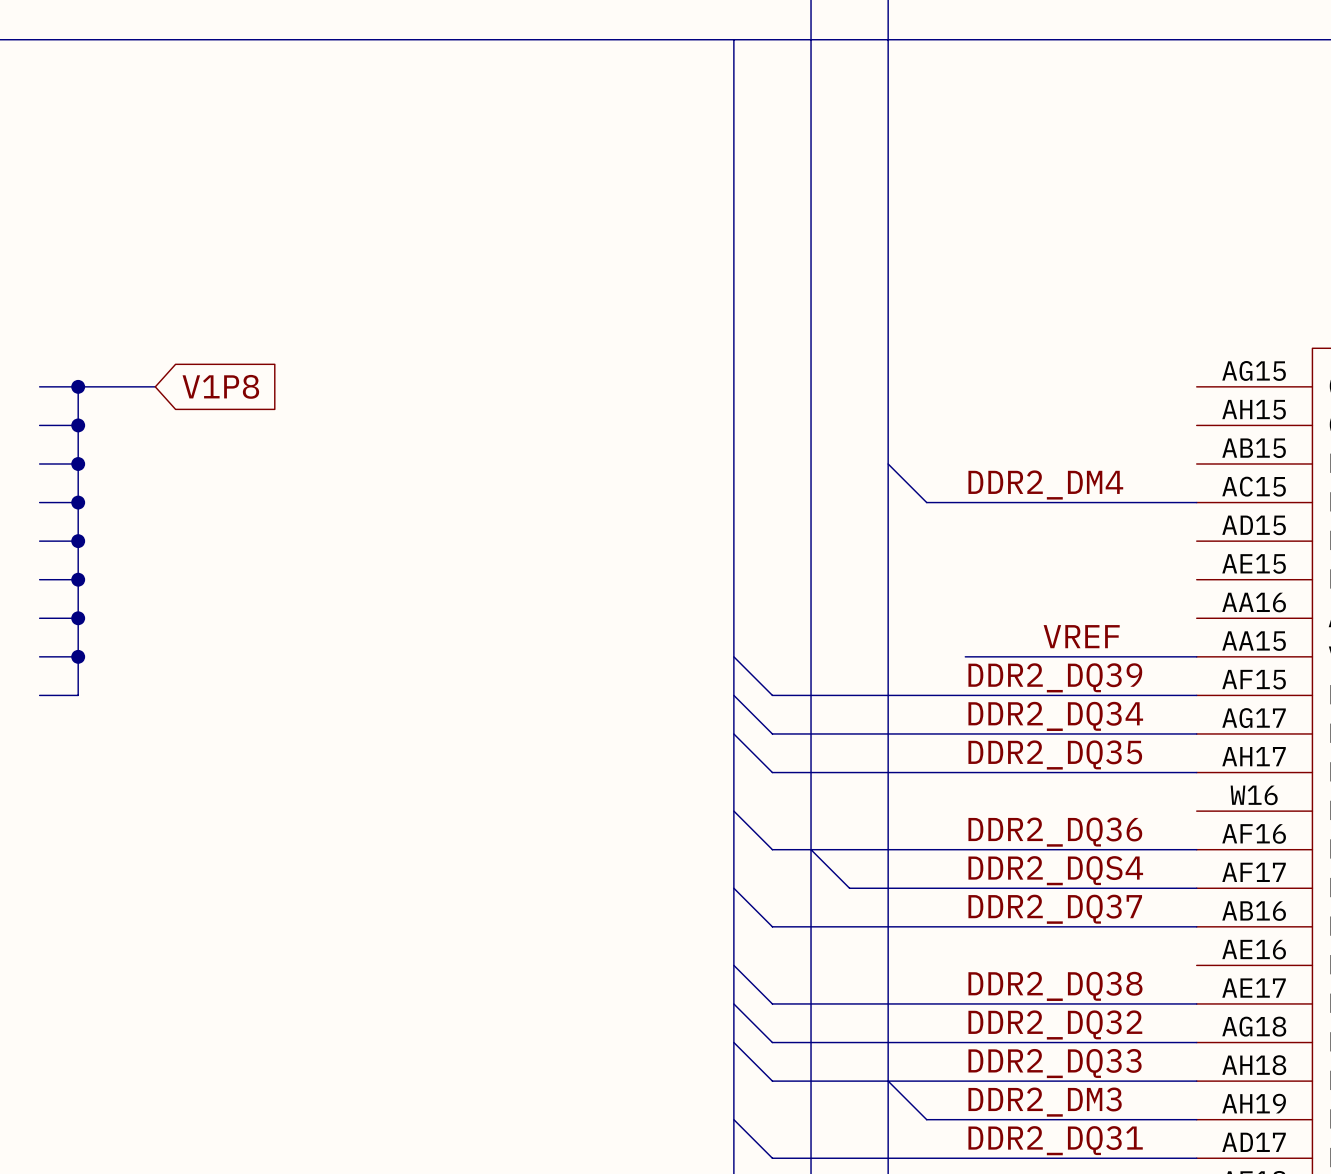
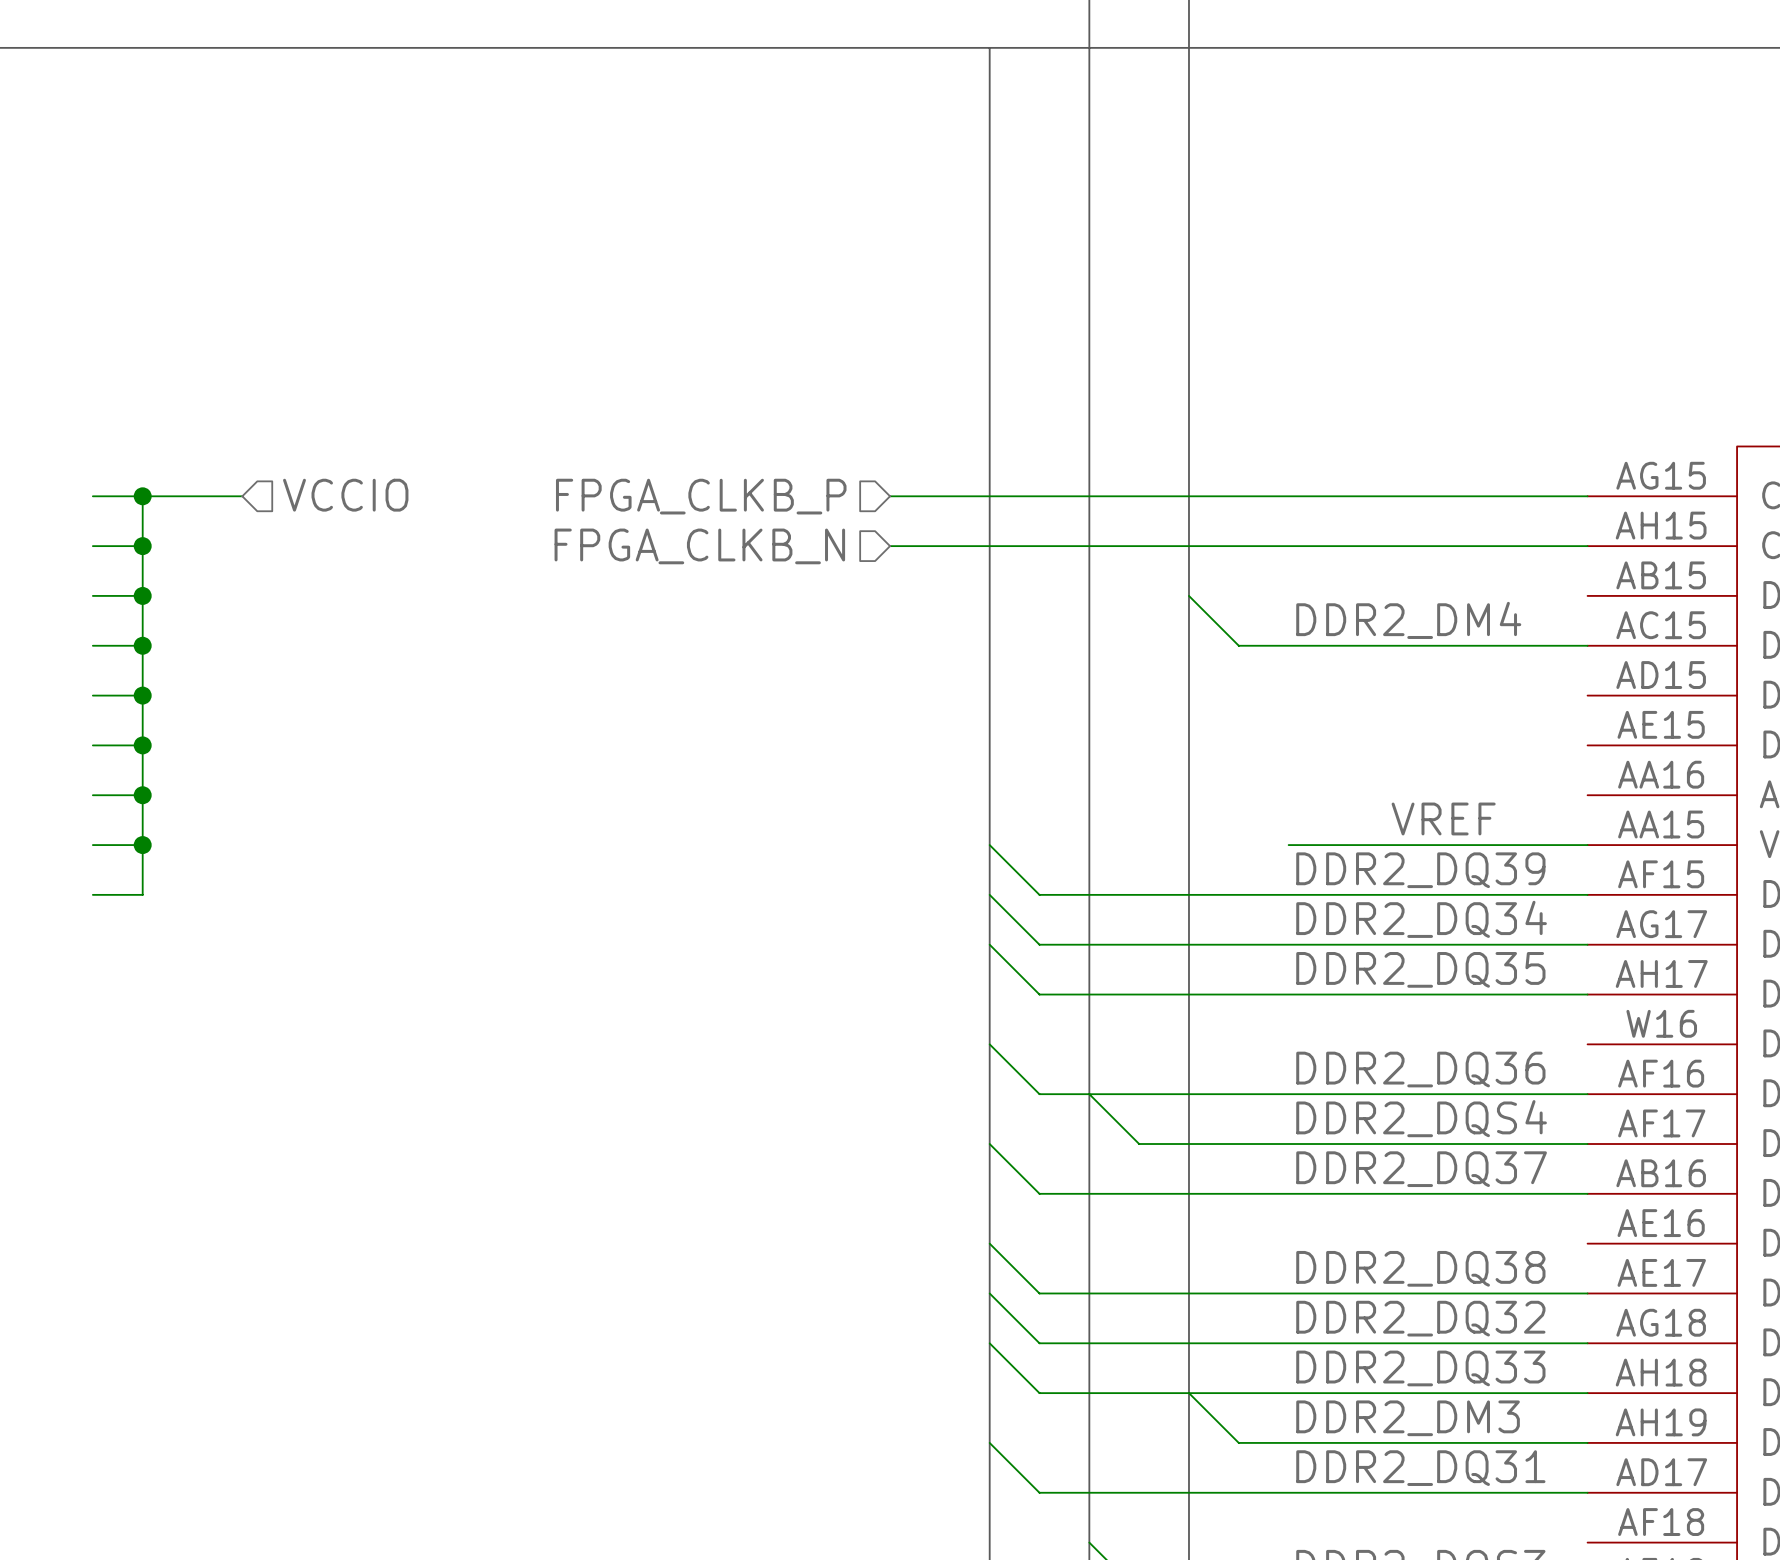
hierarchical label: none -> VCCIO (345, 495)
global label: V1P8 (220, 386) -> none
wire: none -> (890, 496) (1587, 496)
hierarchical label: none -> FPGA_CLKB_P (701, 496)
wire: none -> (890, 546) (1587, 546)
hierarchical label: none -> FPGA_CLKB_N (699, 546)

